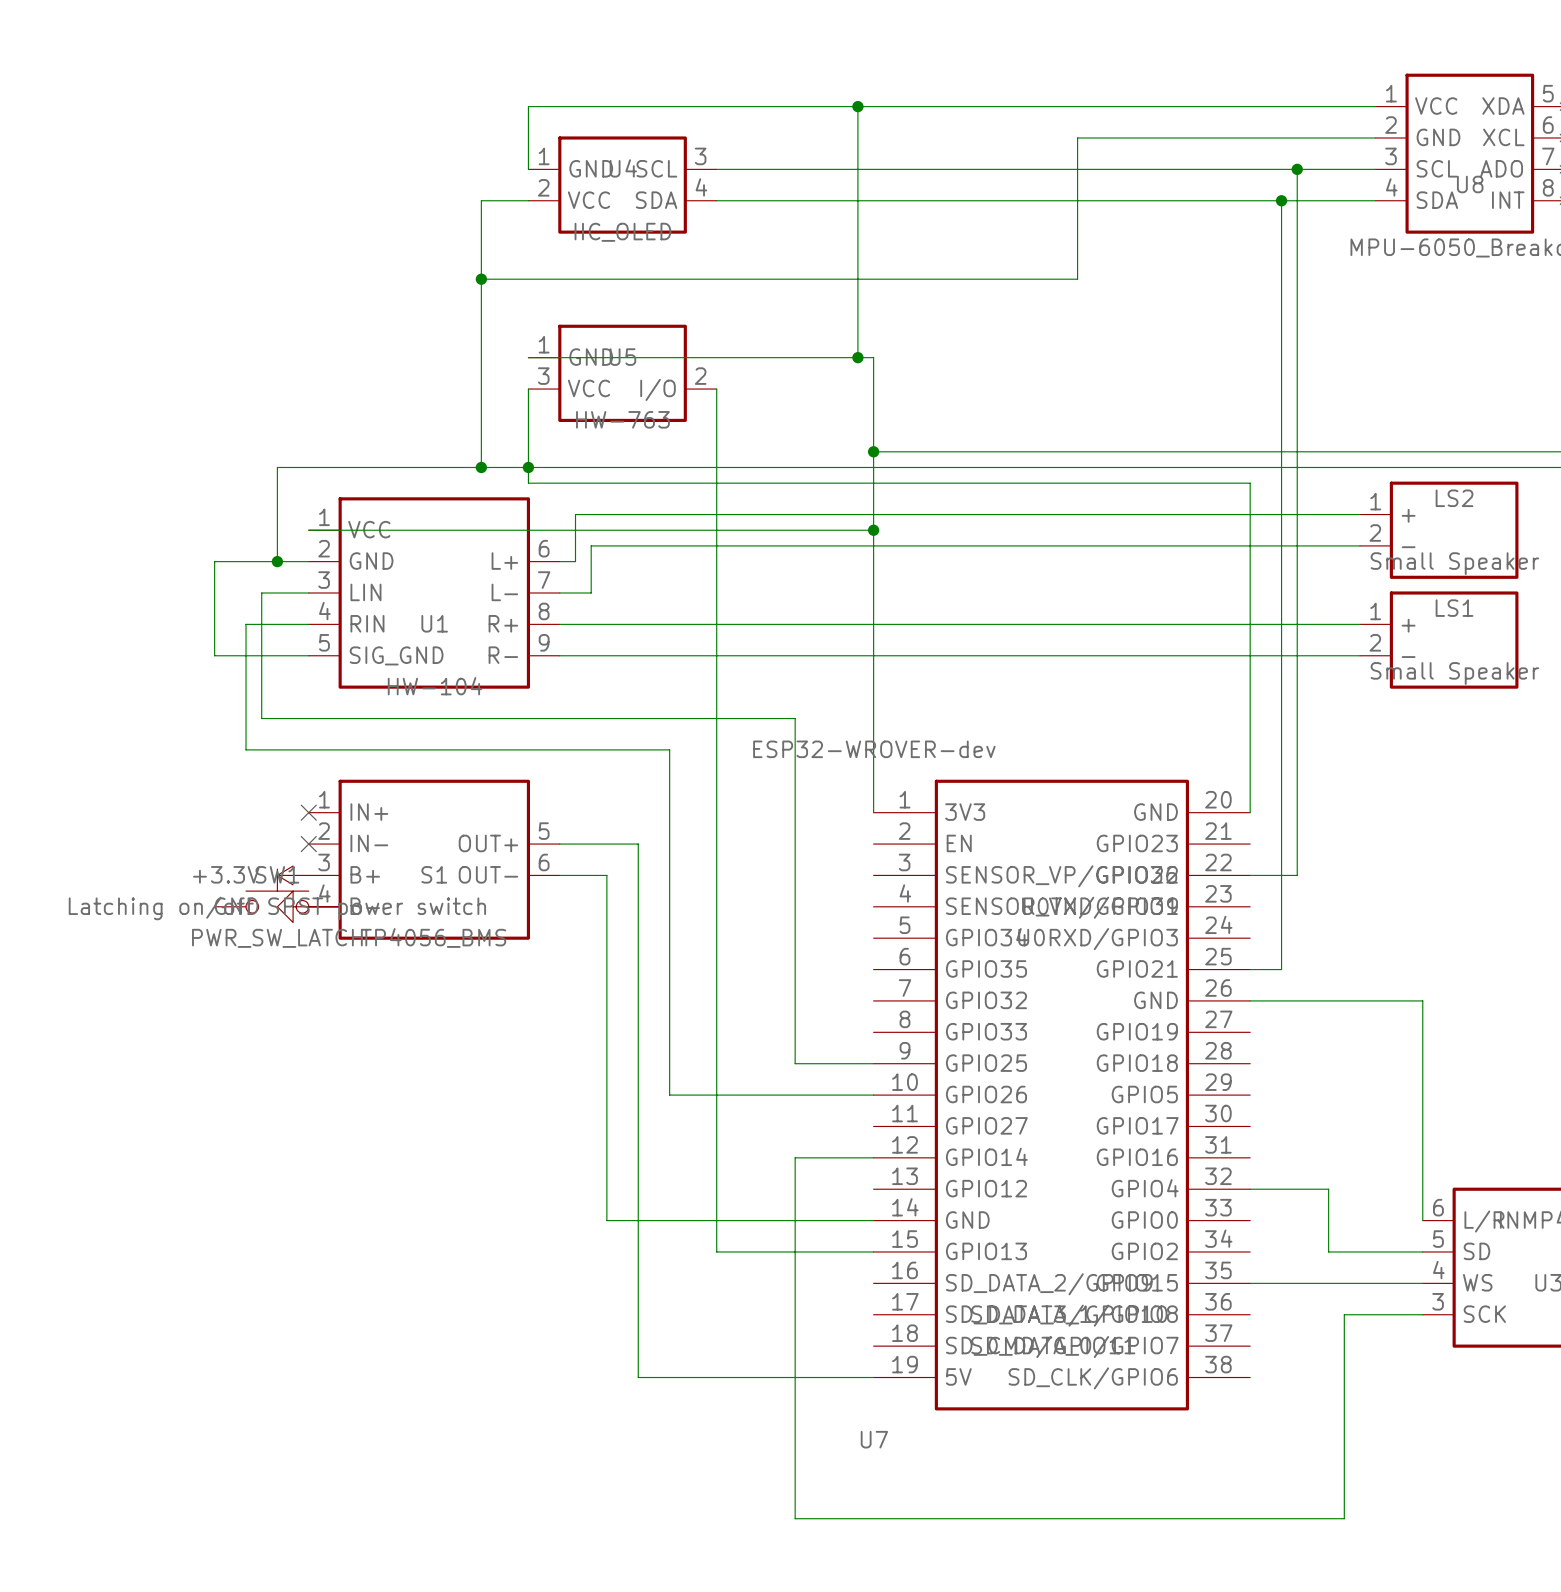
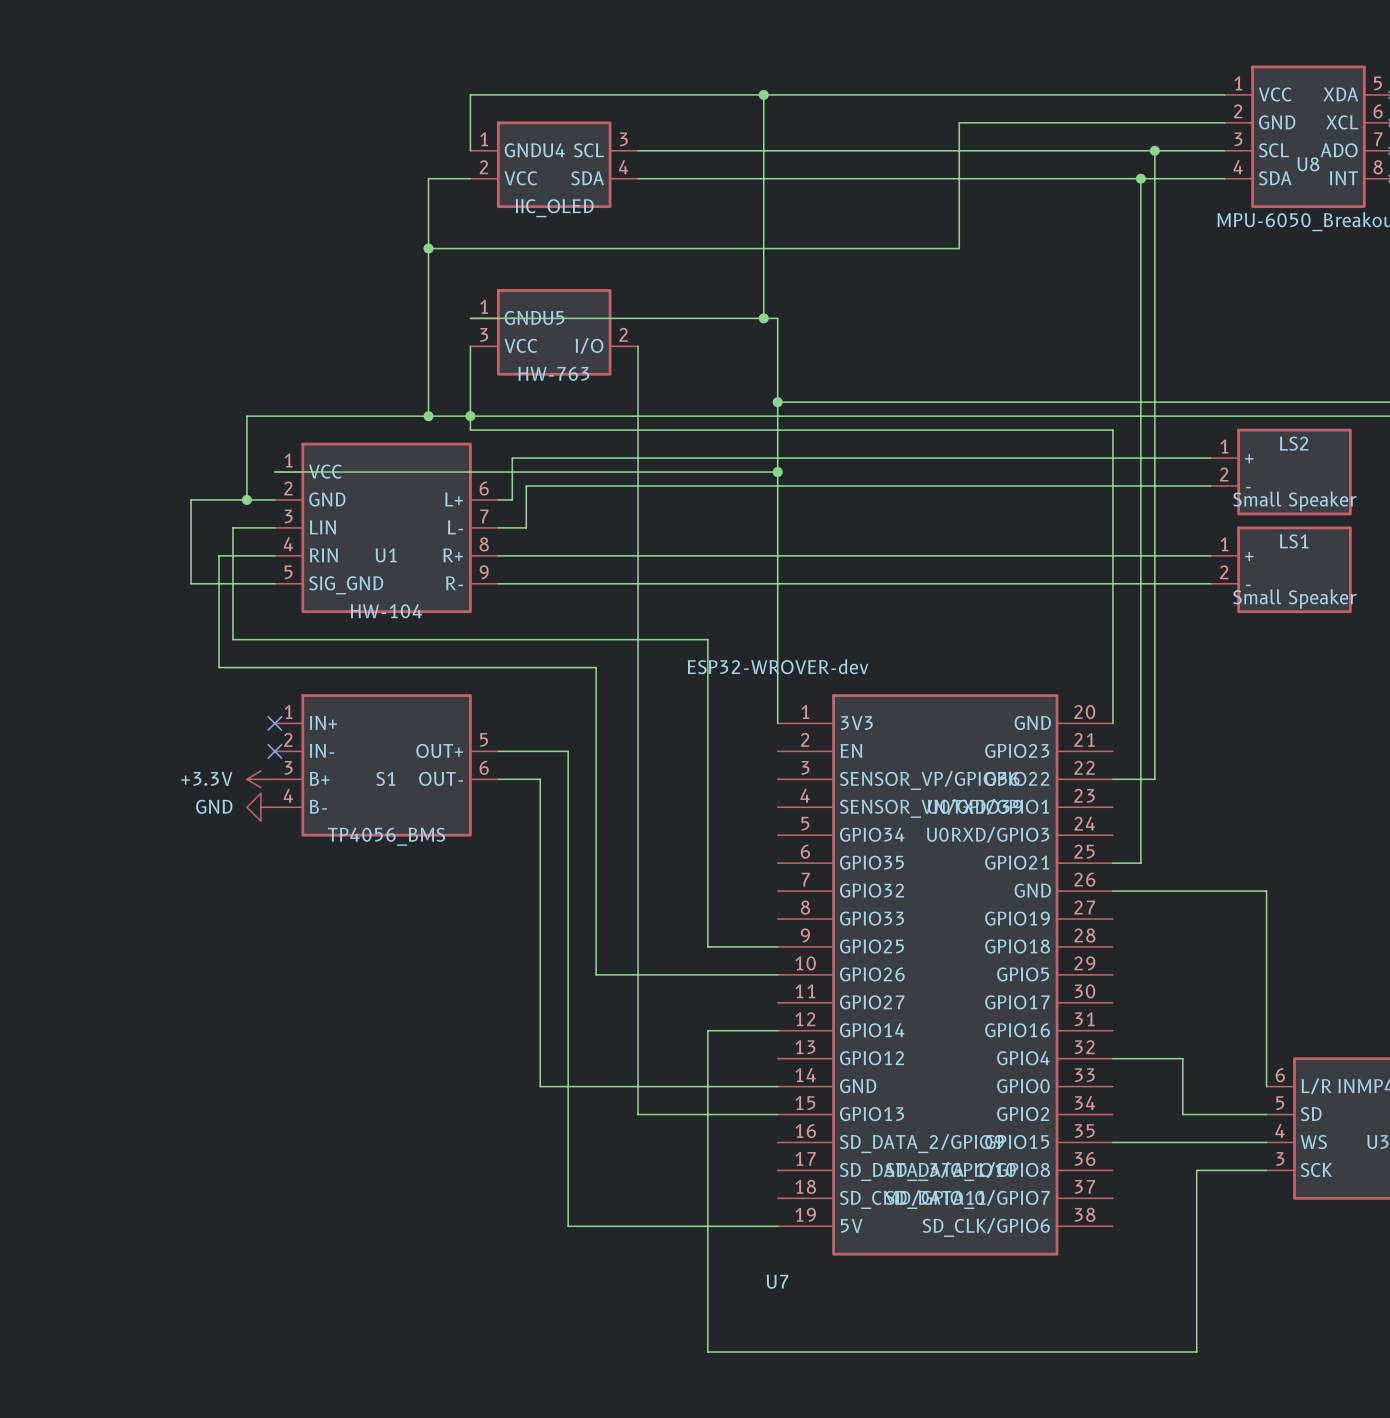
SW1: PWR_SW_LATCH (277, 891) -> none

